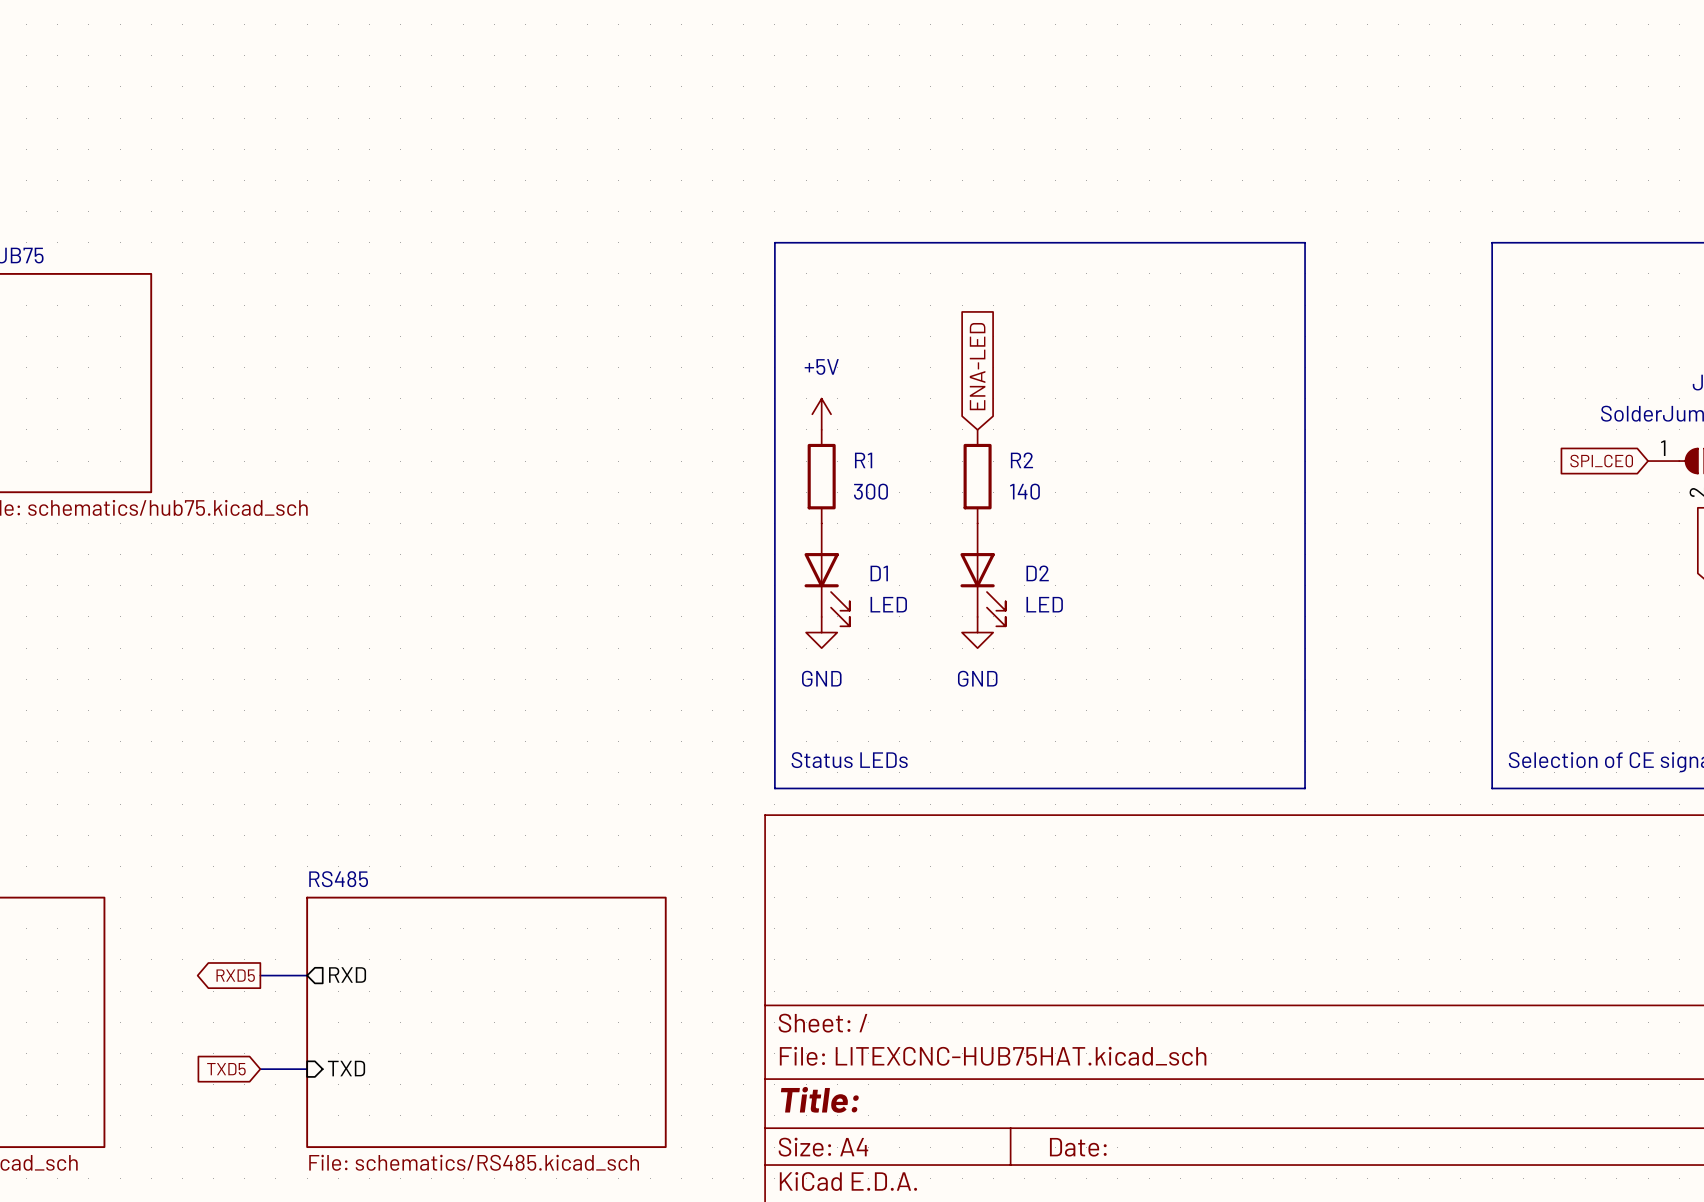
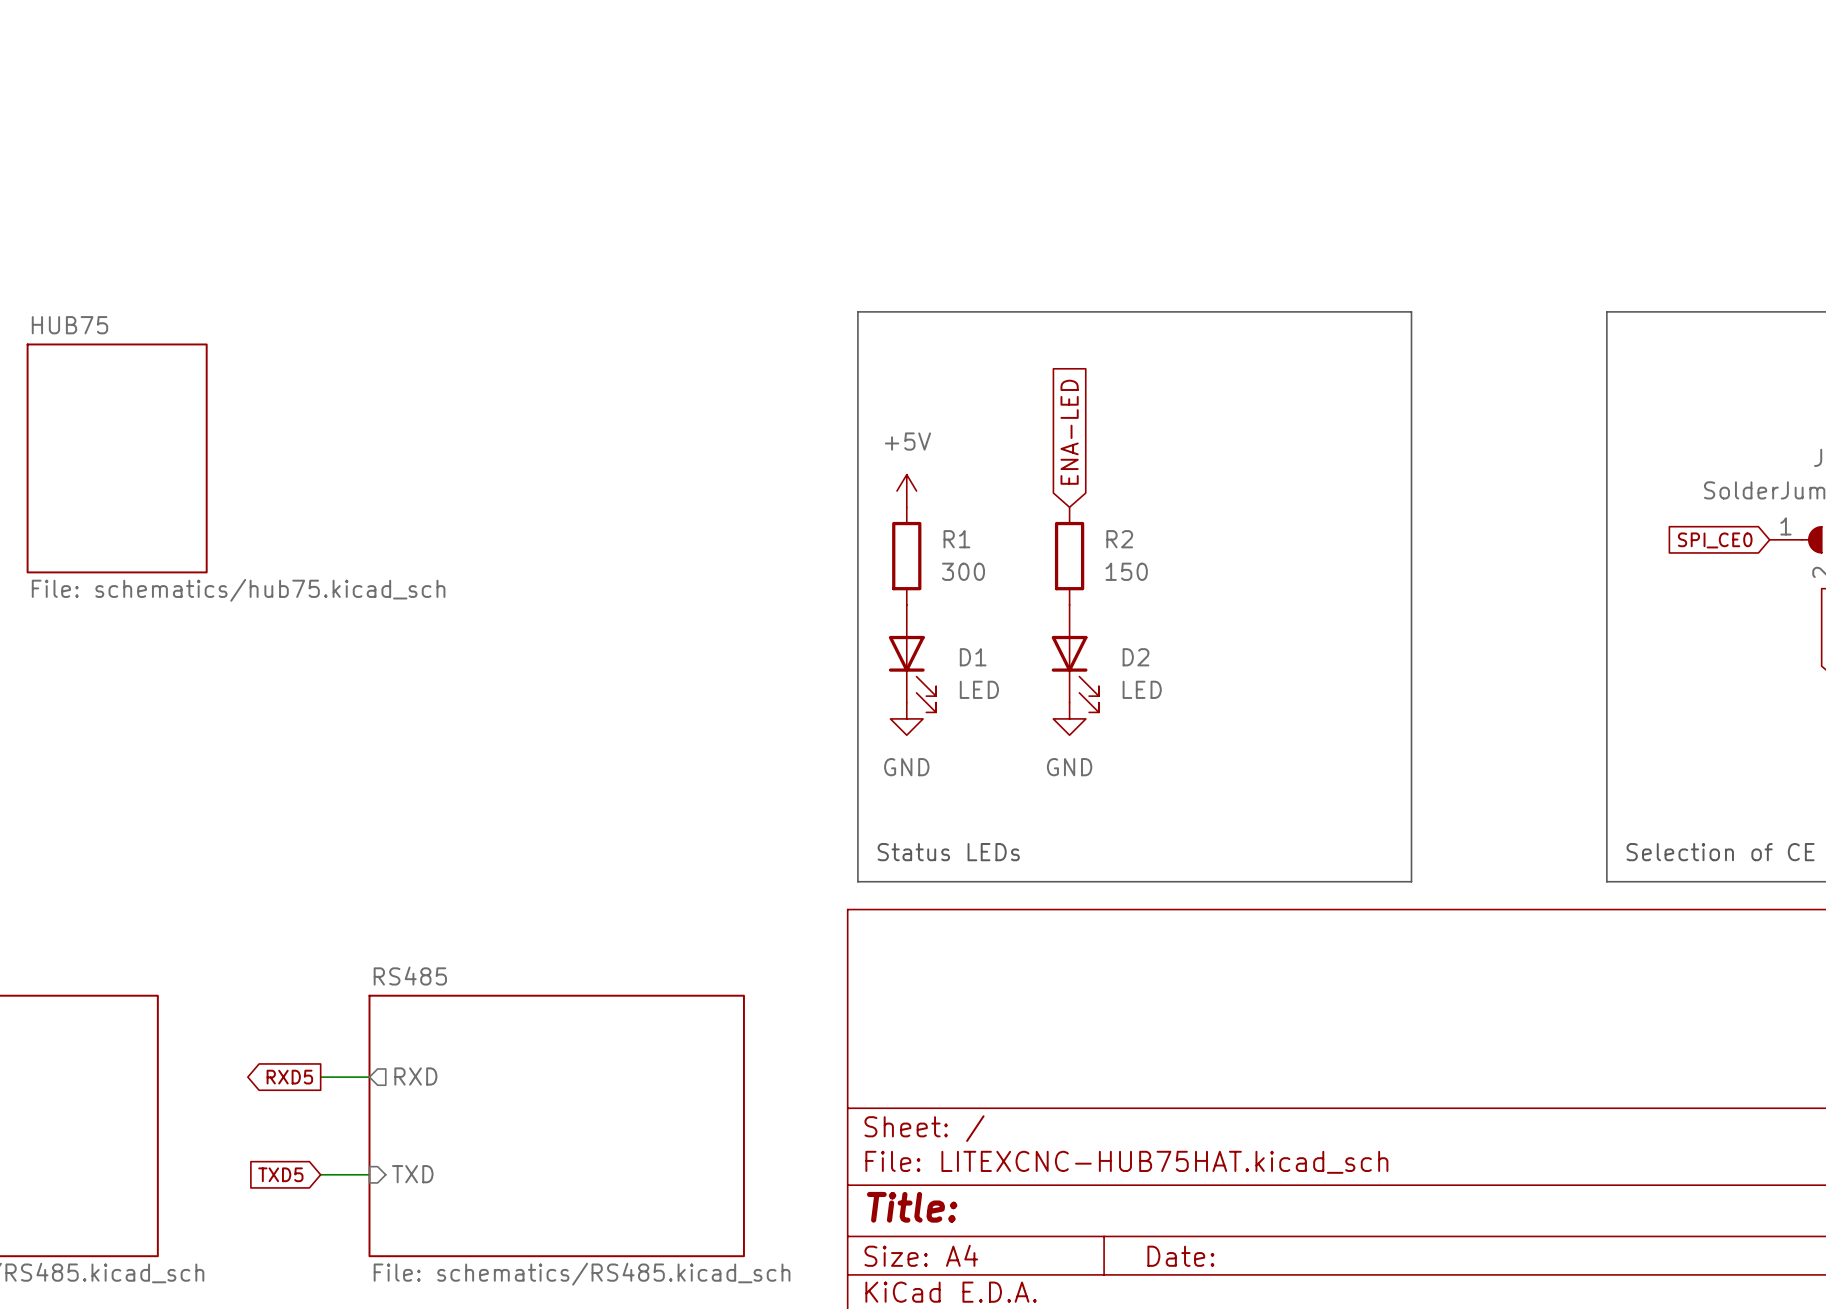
R2 value: 140 (1024, 491) -> 150 (1126, 571)

